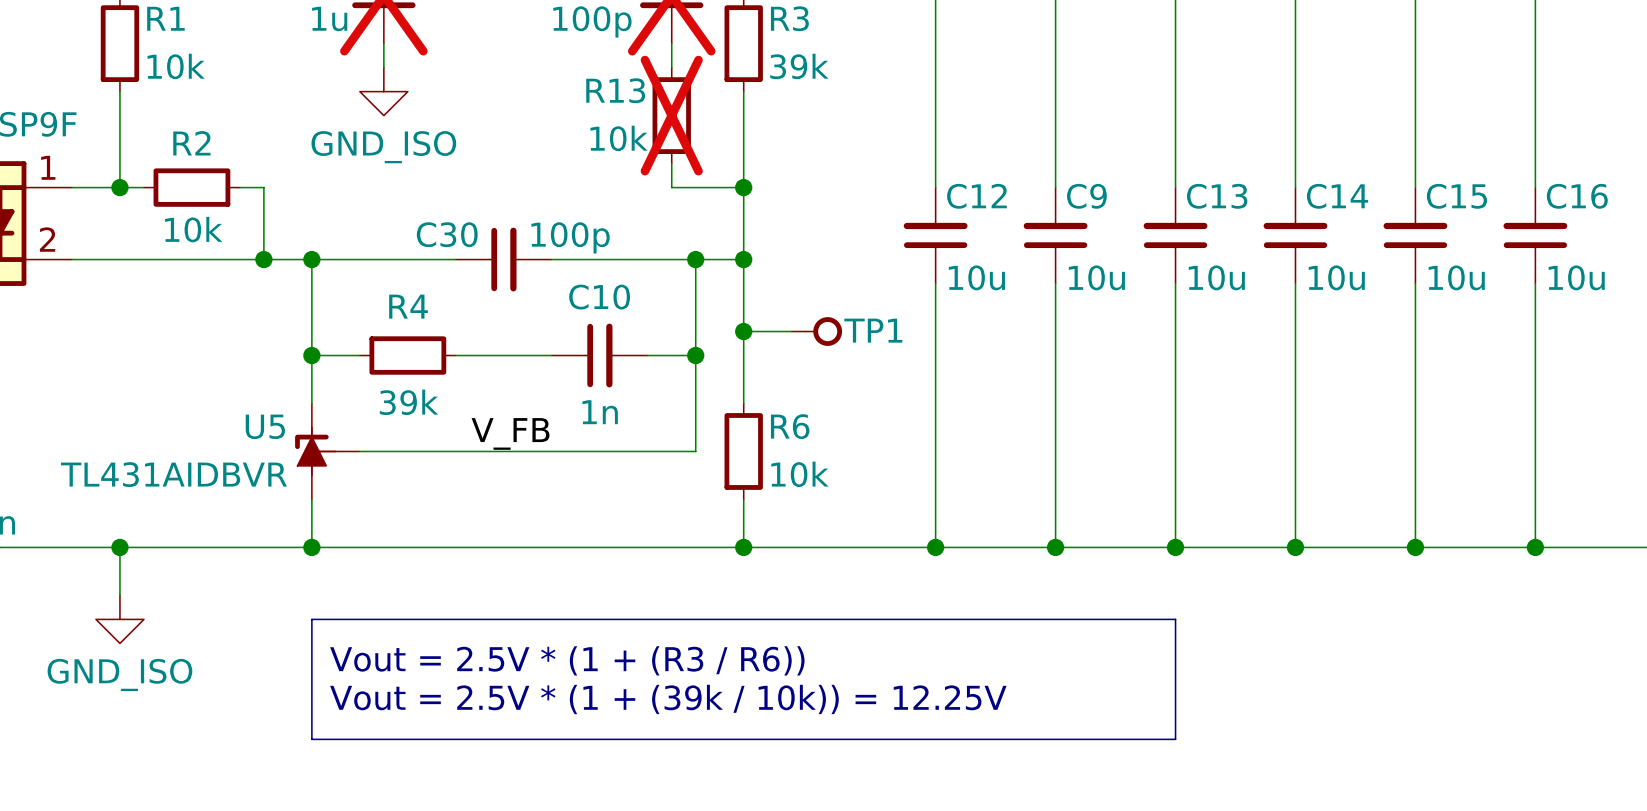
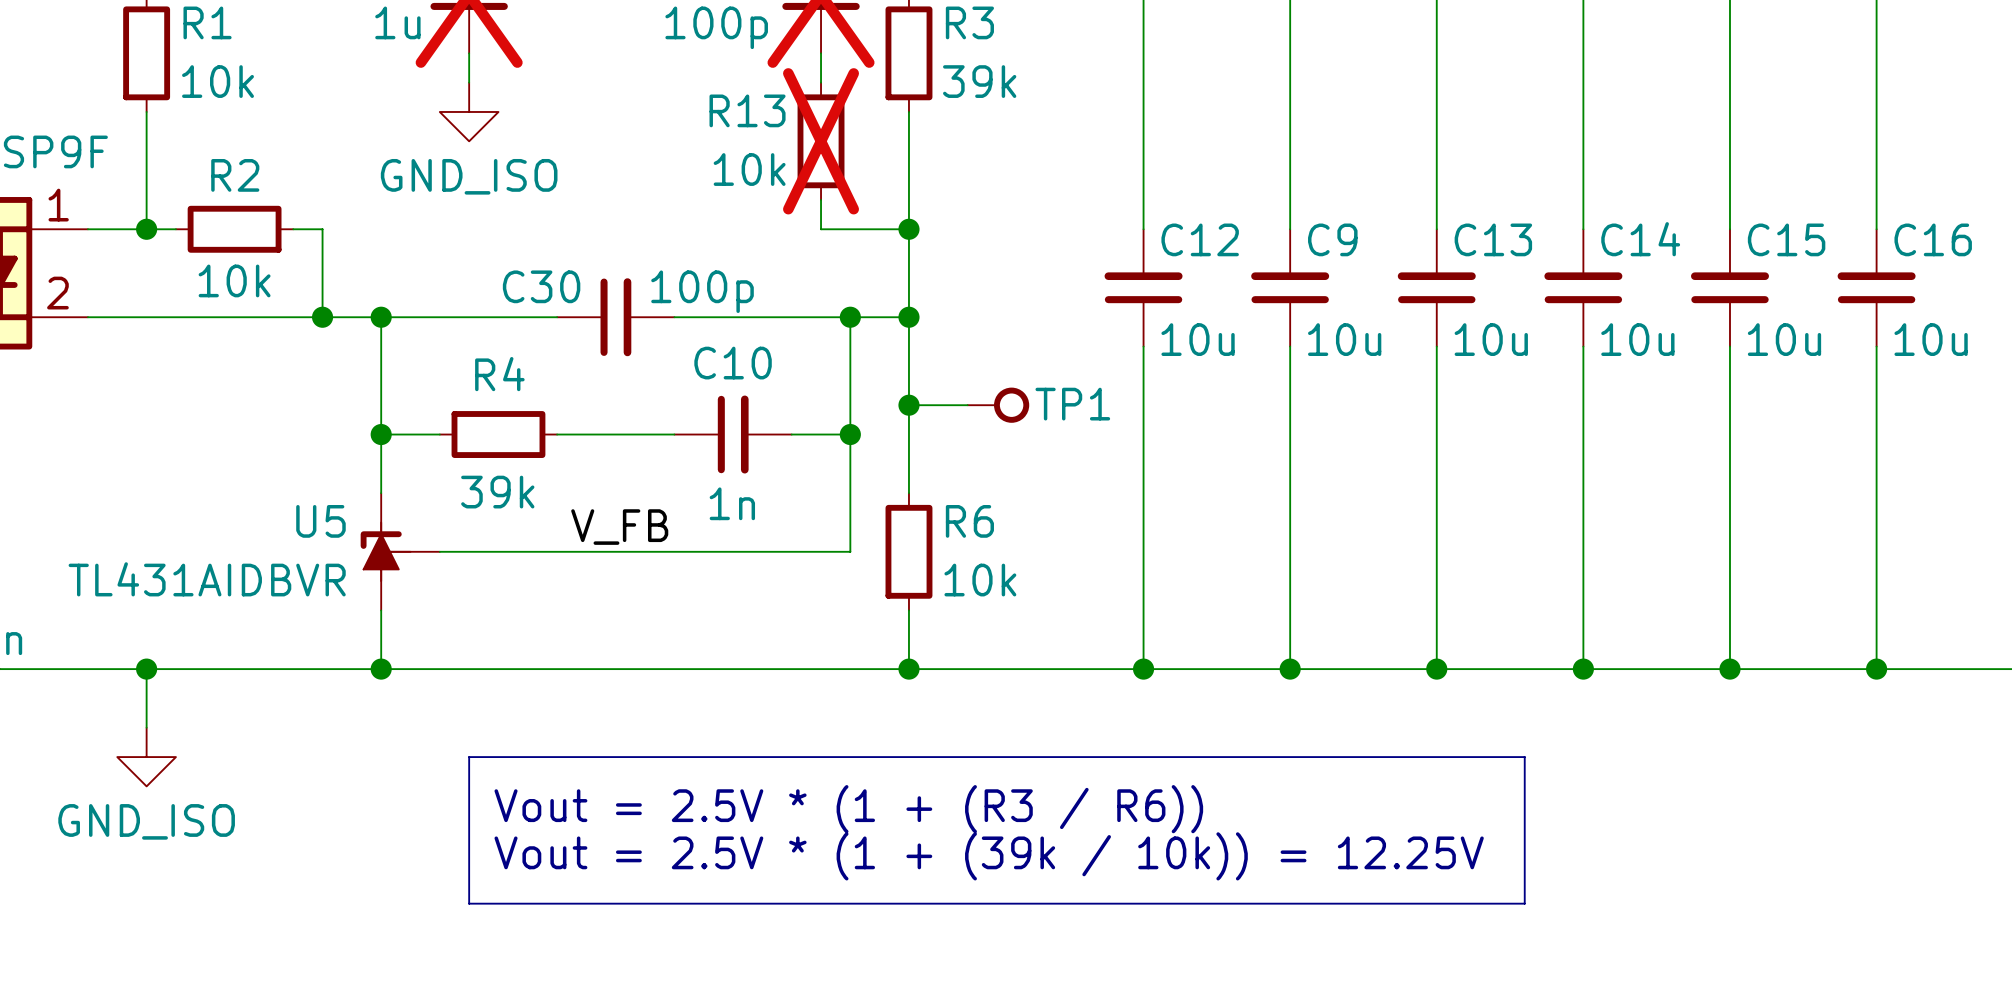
line: (383, 619) (311, 619) (311, 739) (383, 739) -> (469, 757) (469, 903)
line: (1175, 619) (1175, 739) -> (1436, 757) (1524, 757) (1524, 903) (1436, 903)
text position: Vout = 2.5V * (1 + (R3 / R6)) (567, 660) -> Vout = 2.5V * (1 + (R3 / R6)) (848, 809)
text position: Vout = 2.5V * (1 + (39k / 10k)) = 12.25V (668, 699) -> Vout = 2.5V * (1 + (39k / 10k)) = 12.25V (989, 856)

